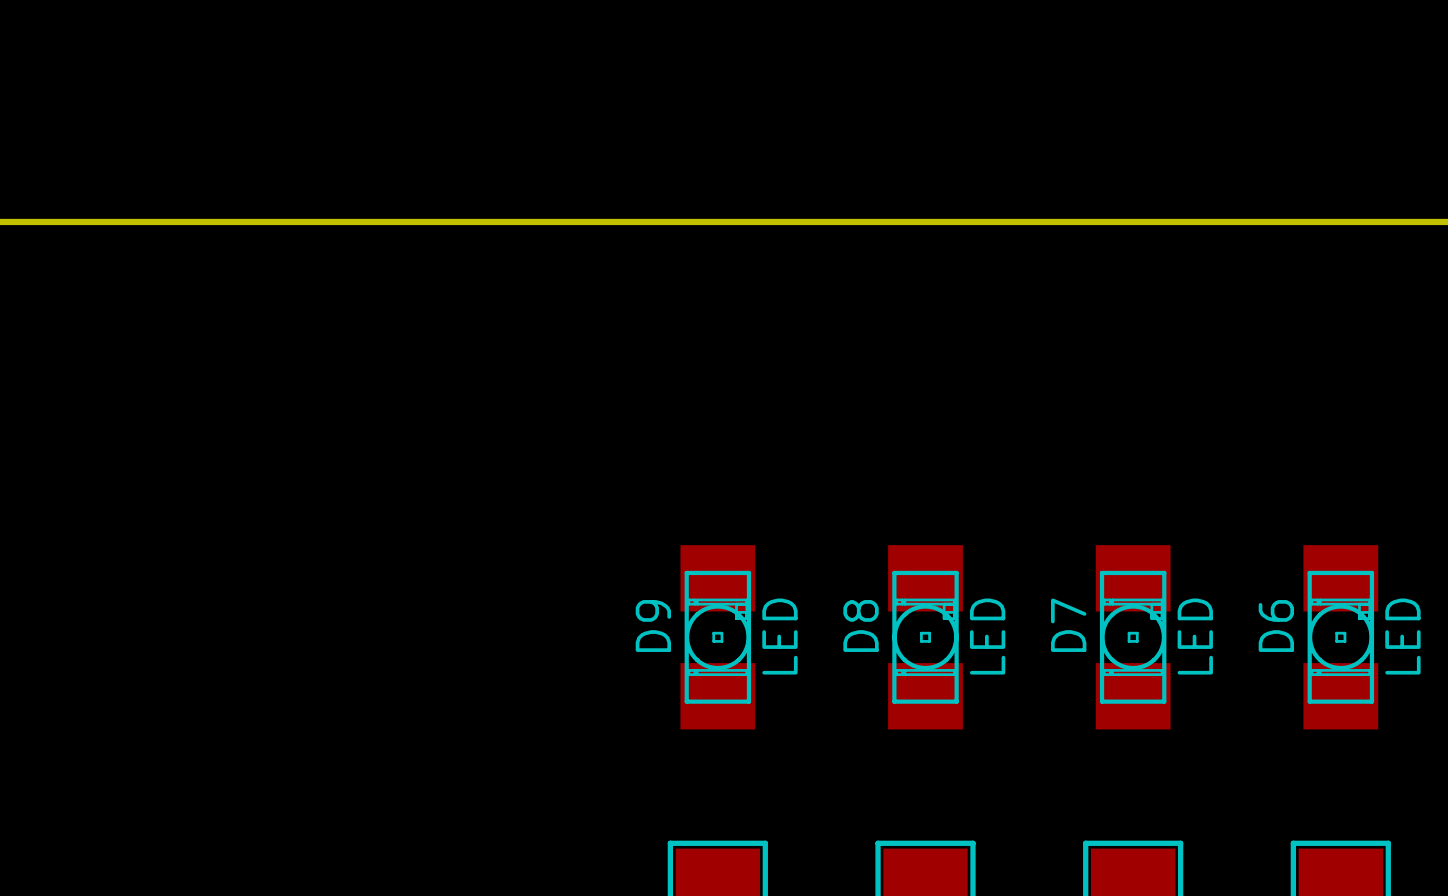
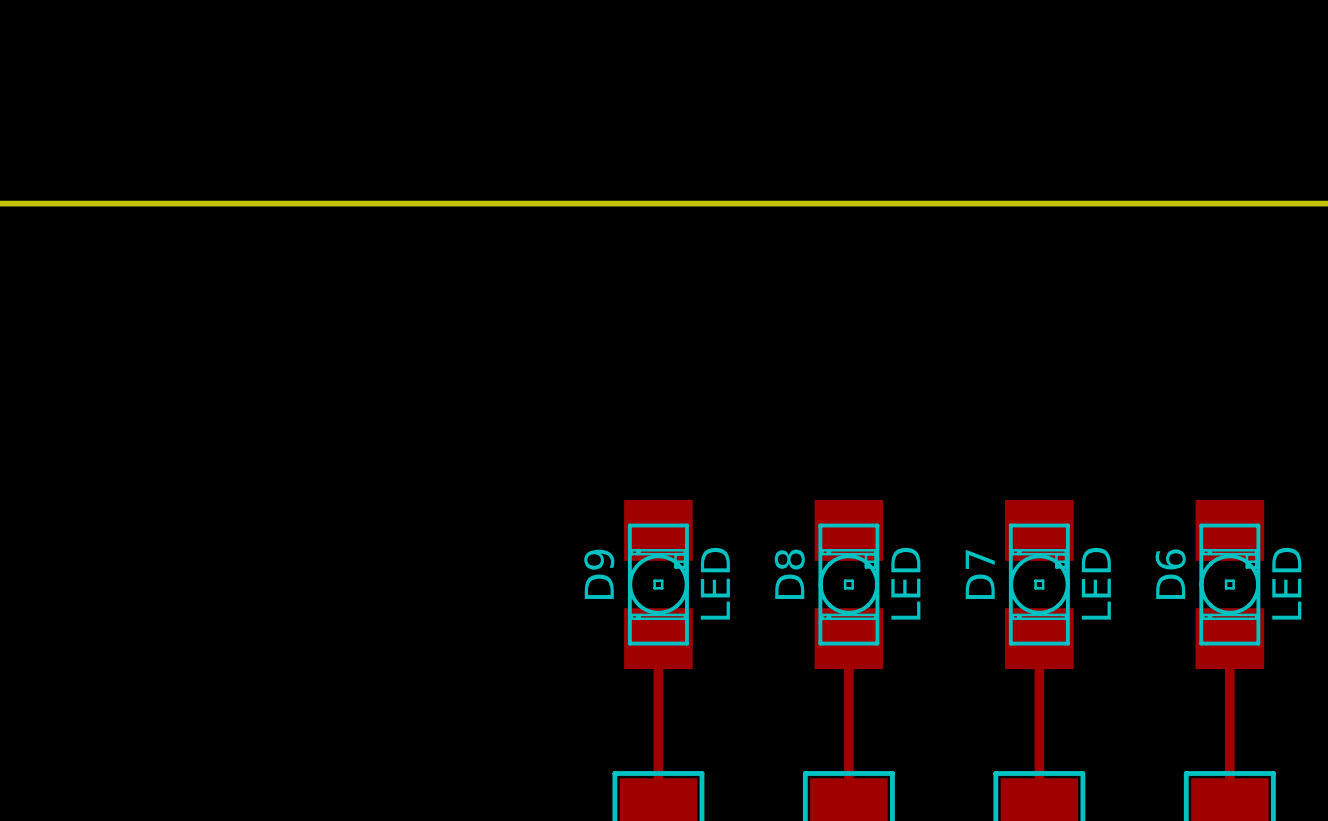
top track: none -> (658, 638) (658, 807)
top track: none -> (848, 638) (848, 807)
top track: none -> (1039, 638) (1039, 807)
top track: none -> (1229, 638) (1229, 807)

